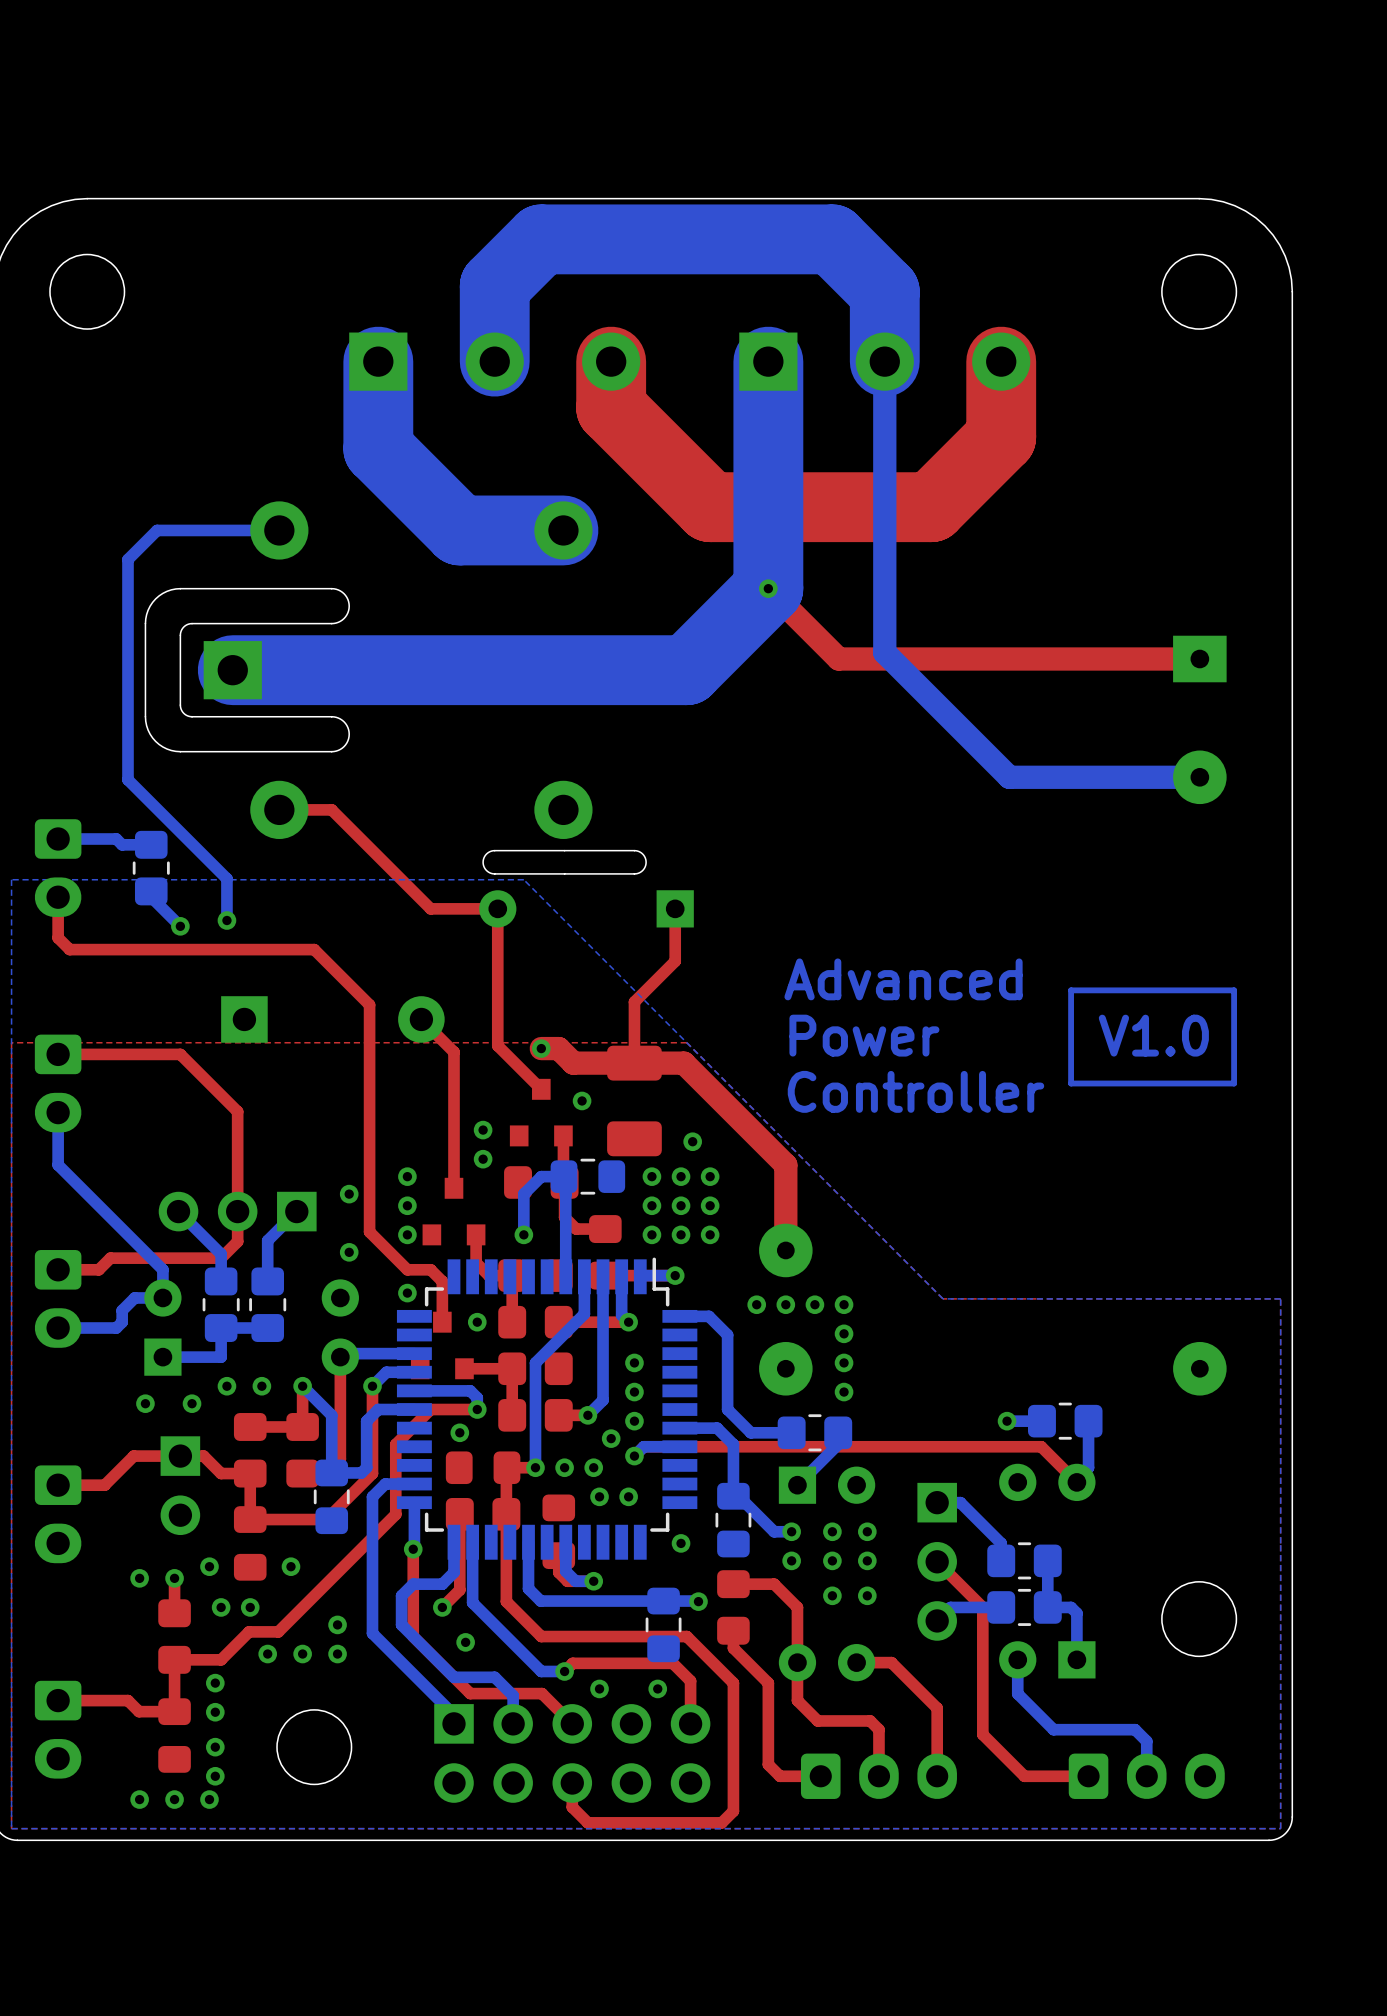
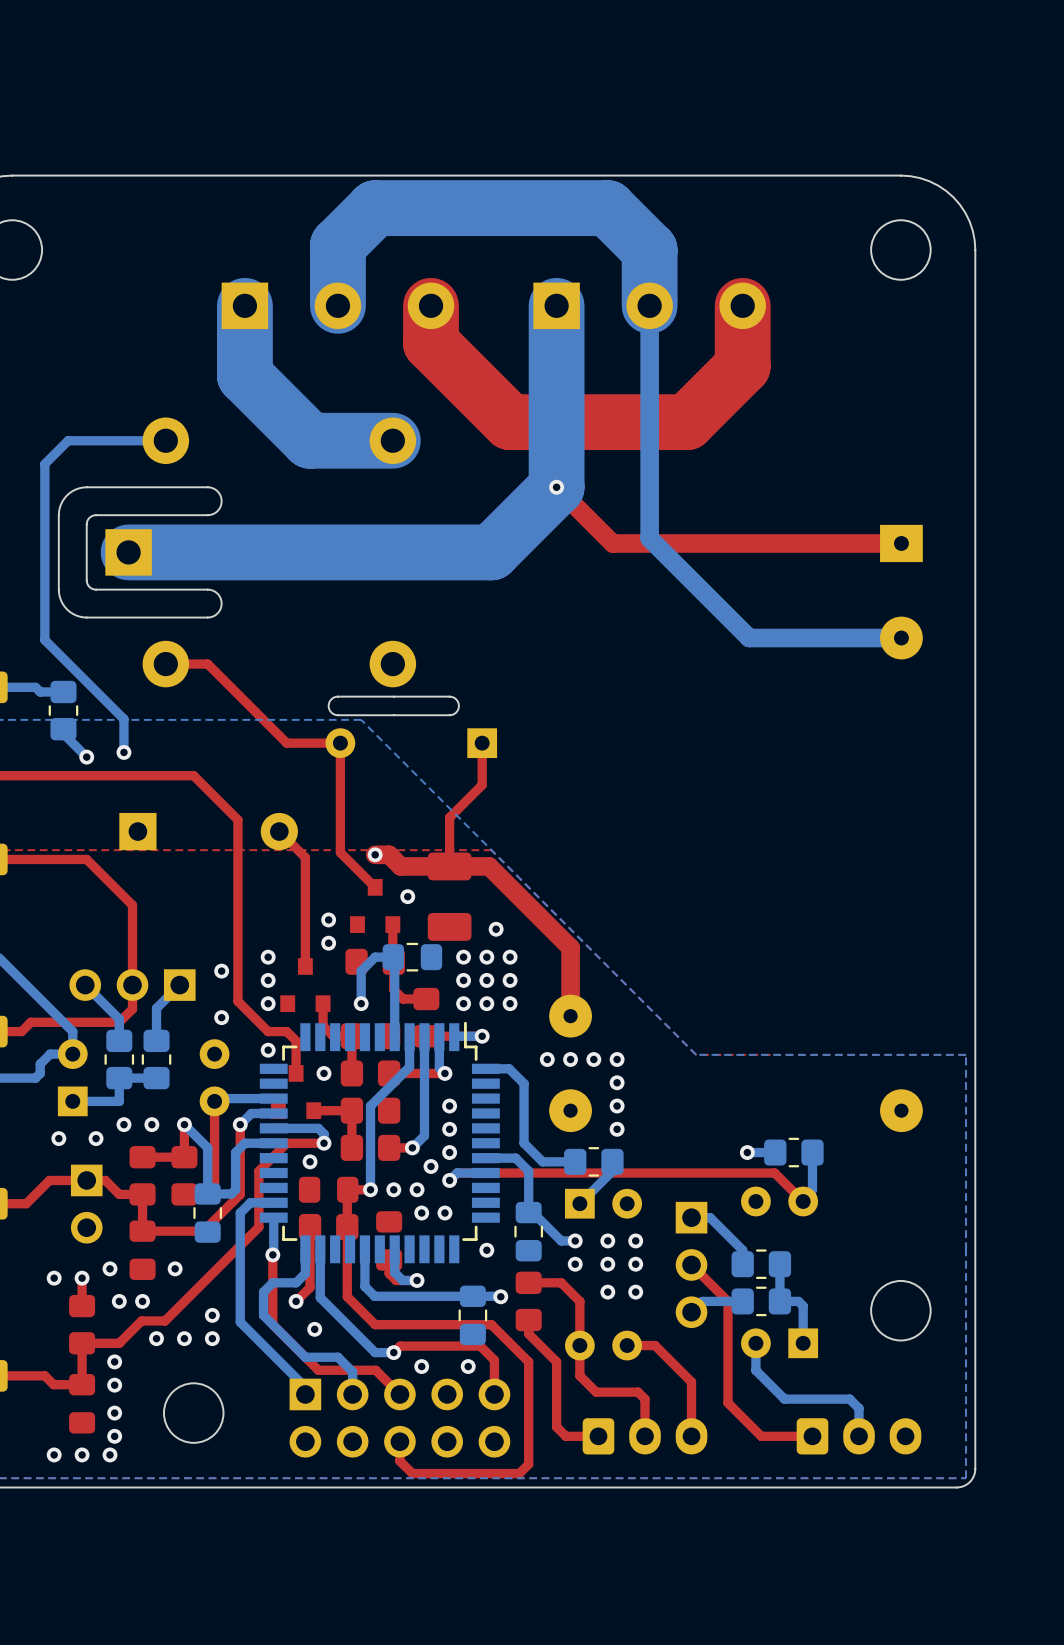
text: Advanced (903, 979) -> none
bottom track: (1234, 990) (1234, 1083) (1071, 1083) (1071, 990) (1234, 990) -> none
text: Power V1.0 (999, 1035) -> none
text: Controller (916, 1091) -> none

